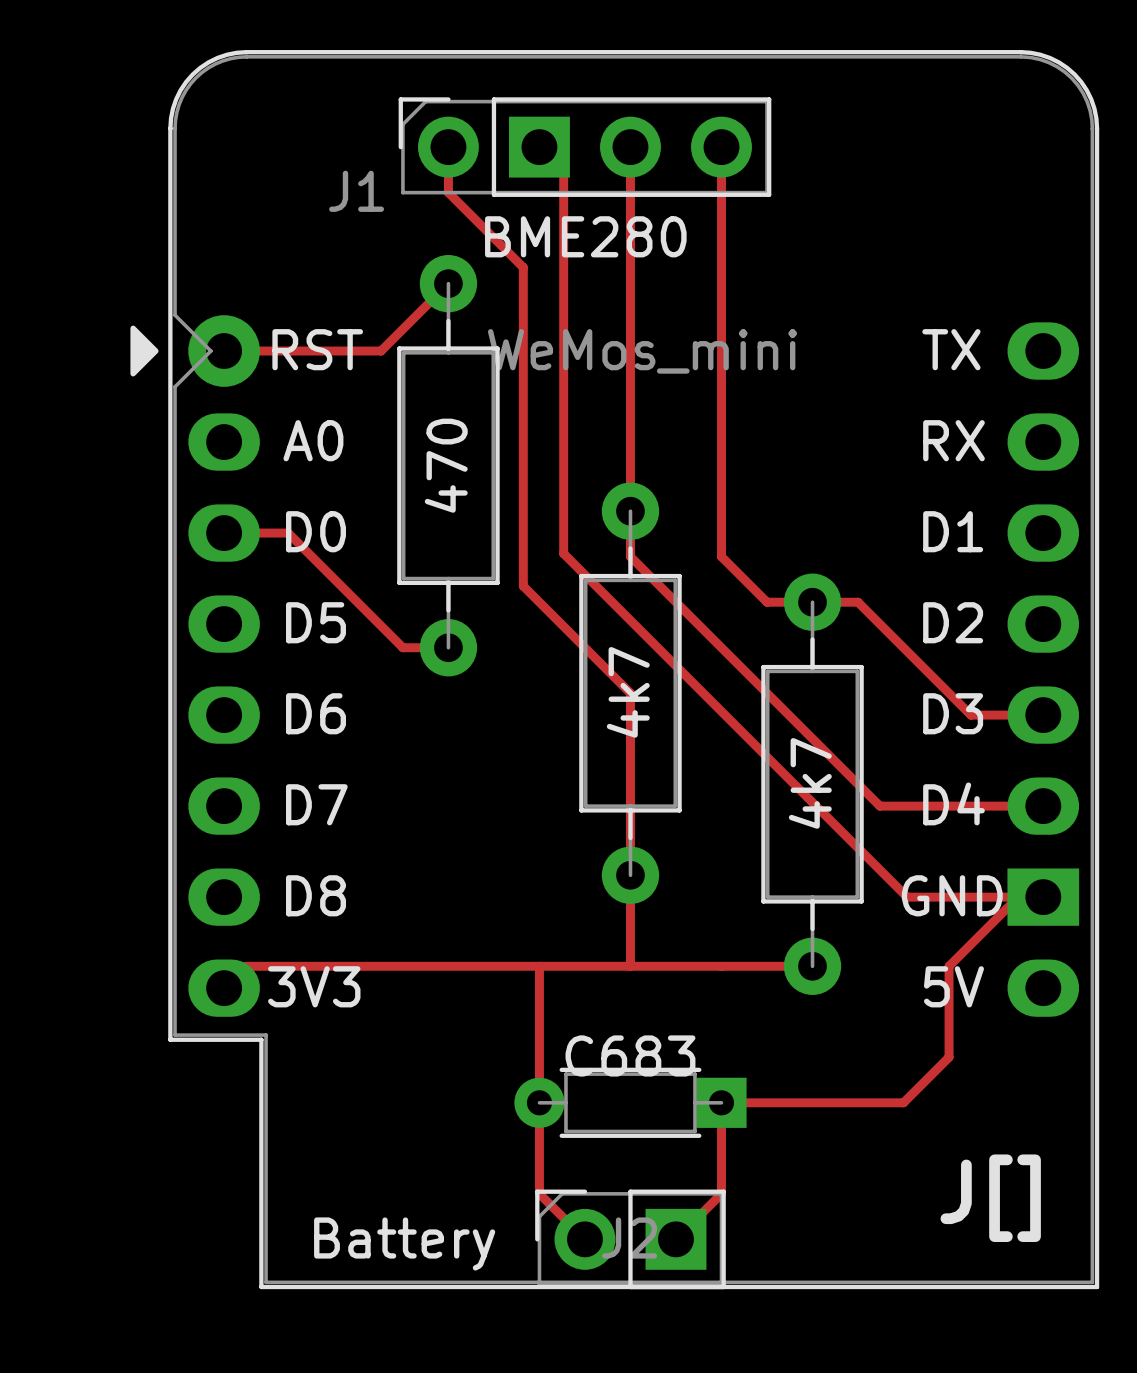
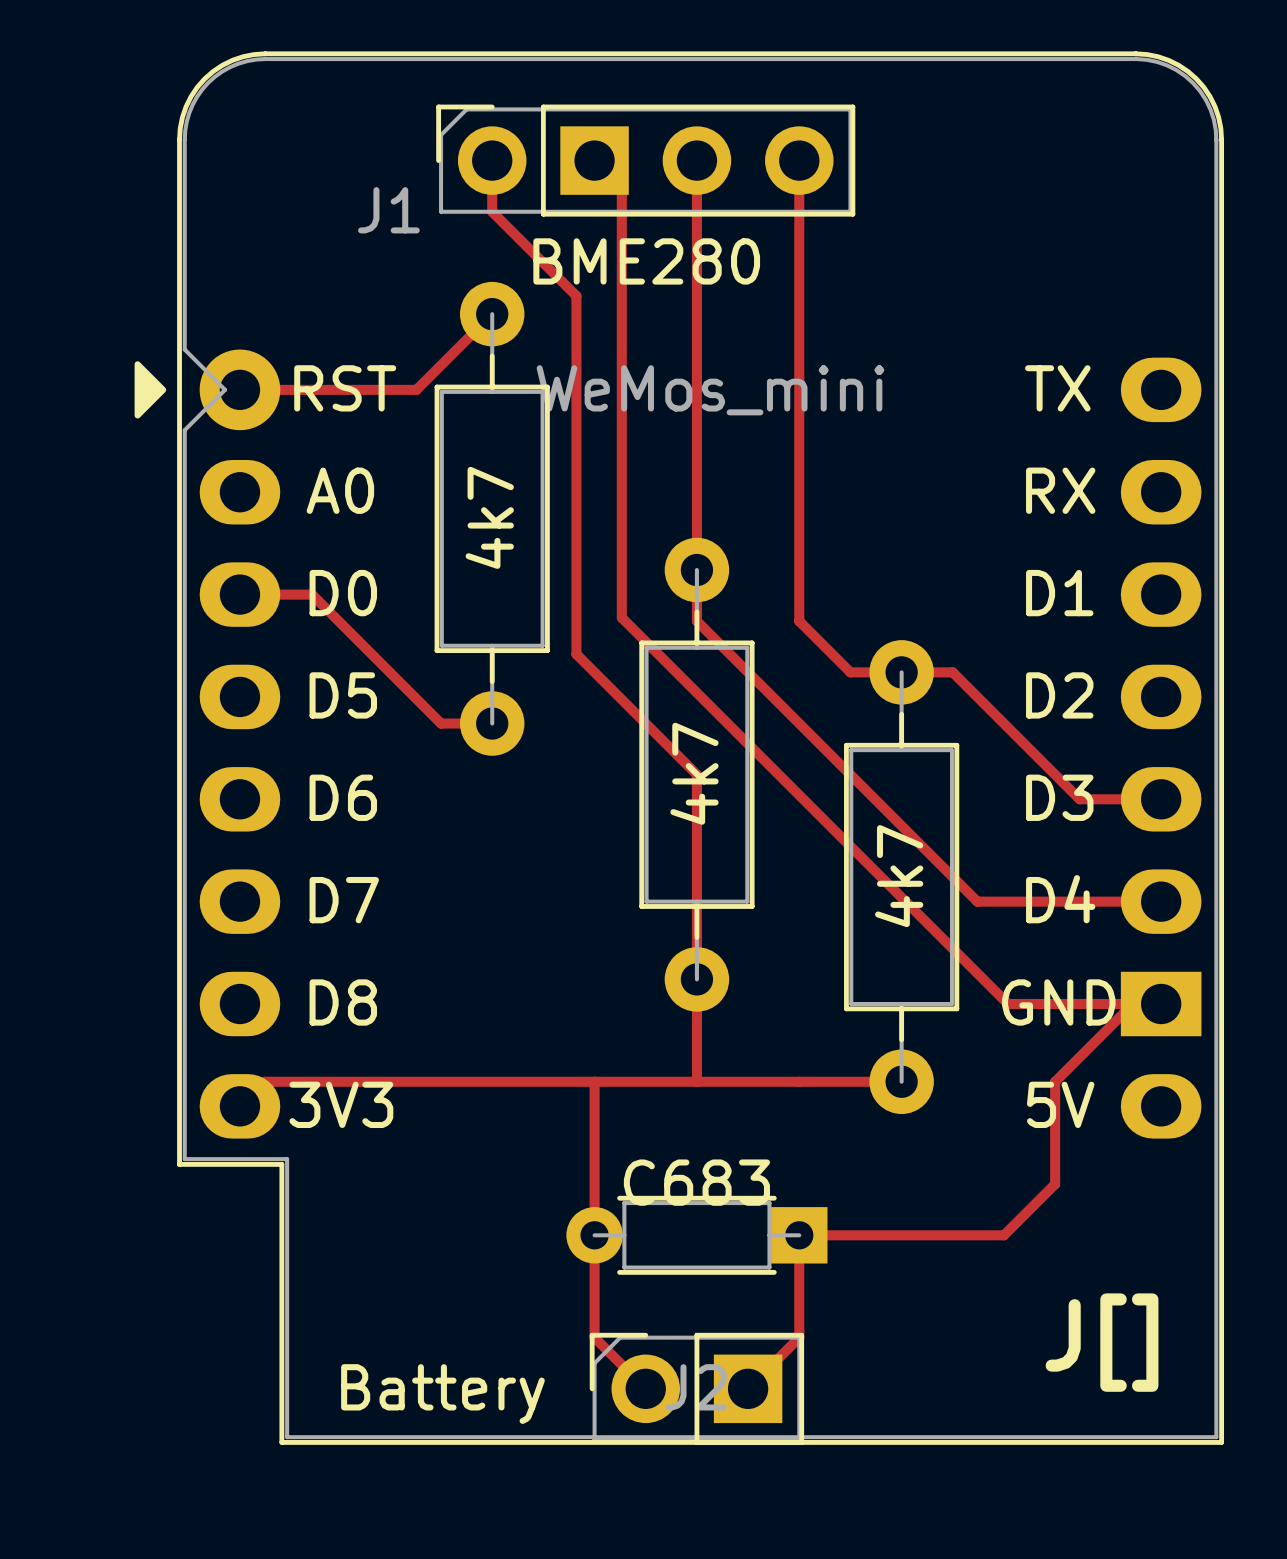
part value: 470 (446, 465) -> 4k7 (489, 517)

